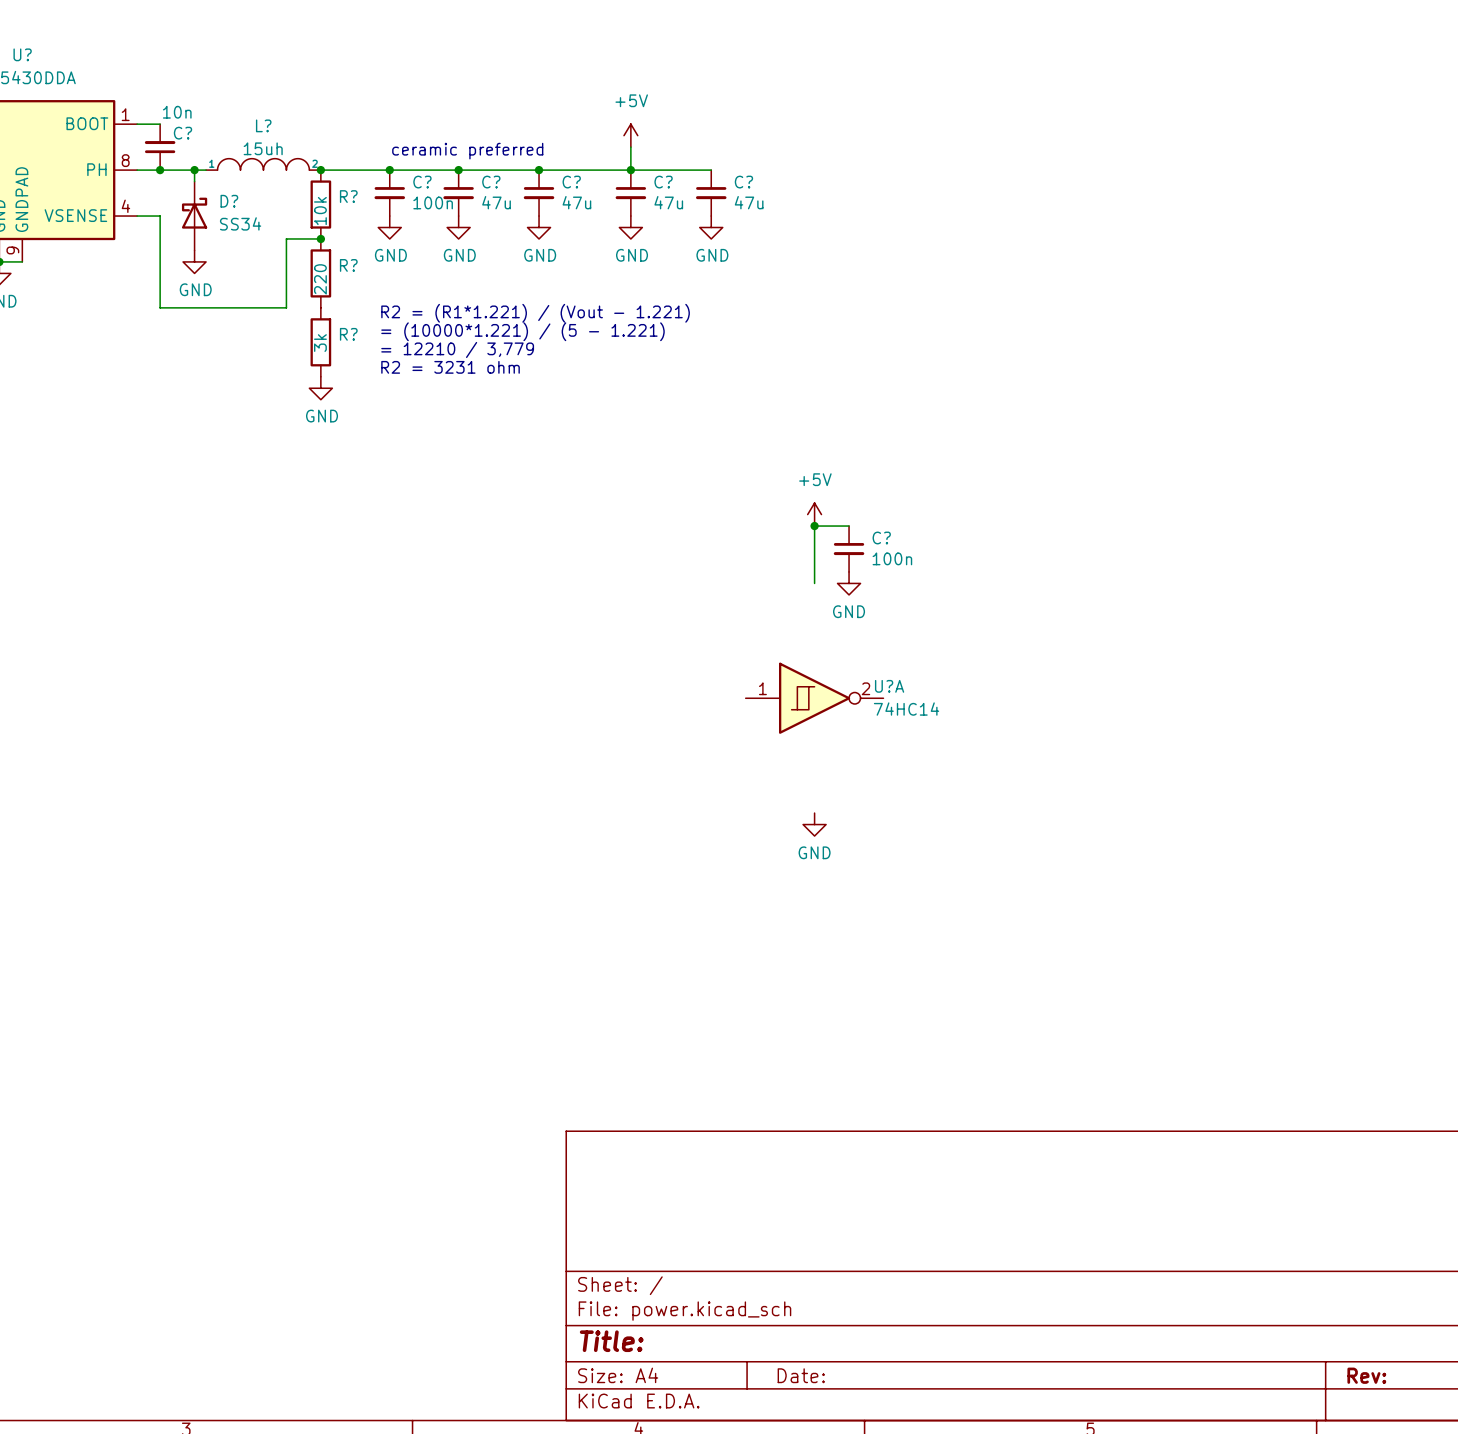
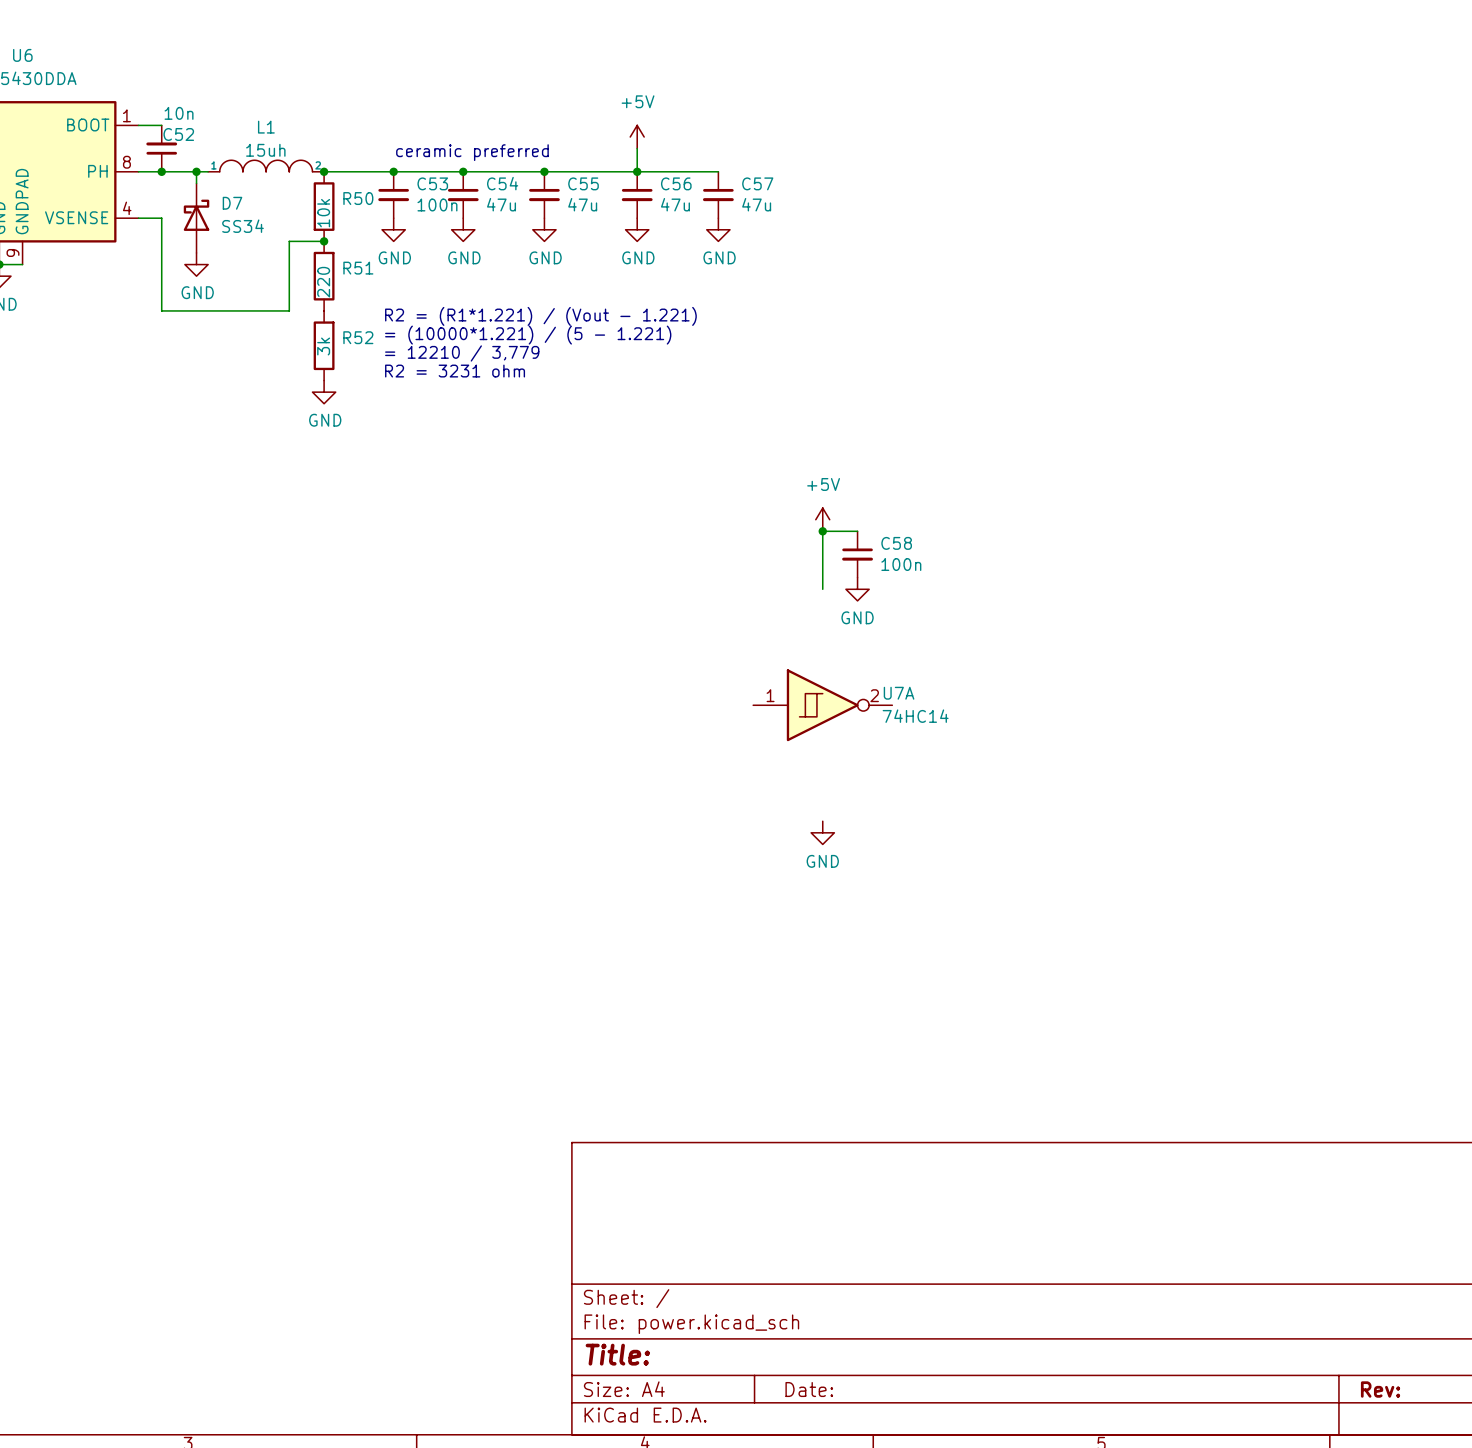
U? name: U? (22, 54) -> U6 (22, 55)
L? name: L? (263, 125) -> L1 (266, 127)
C? name: C? (183, 133) -> C52 (178, 134)
C? name: C? (422, 182) -> C53 (432, 183)
C? name: C? (491, 182) -> C54 (502, 183)
C? name: C? (571, 182) -> C55 (583, 183)
C? name: C? (663, 182) -> C56 (676, 183)
C? name: C? (743, 182) -> C57 (757, 183)
R? name: R? (348, 196) -> R50 (358, 198)
D? name: D? (229, 201) -> D7 (232, 203)
R? name: R? (348, 265) -> R51 (358, 268)
R? name: R? (348, 334) -> R52 (358, 337)
C? name: C? (881, 538) -> C58 (896, 543)
U?A name: U?A (889, 686) -> U7A (899, 693)

